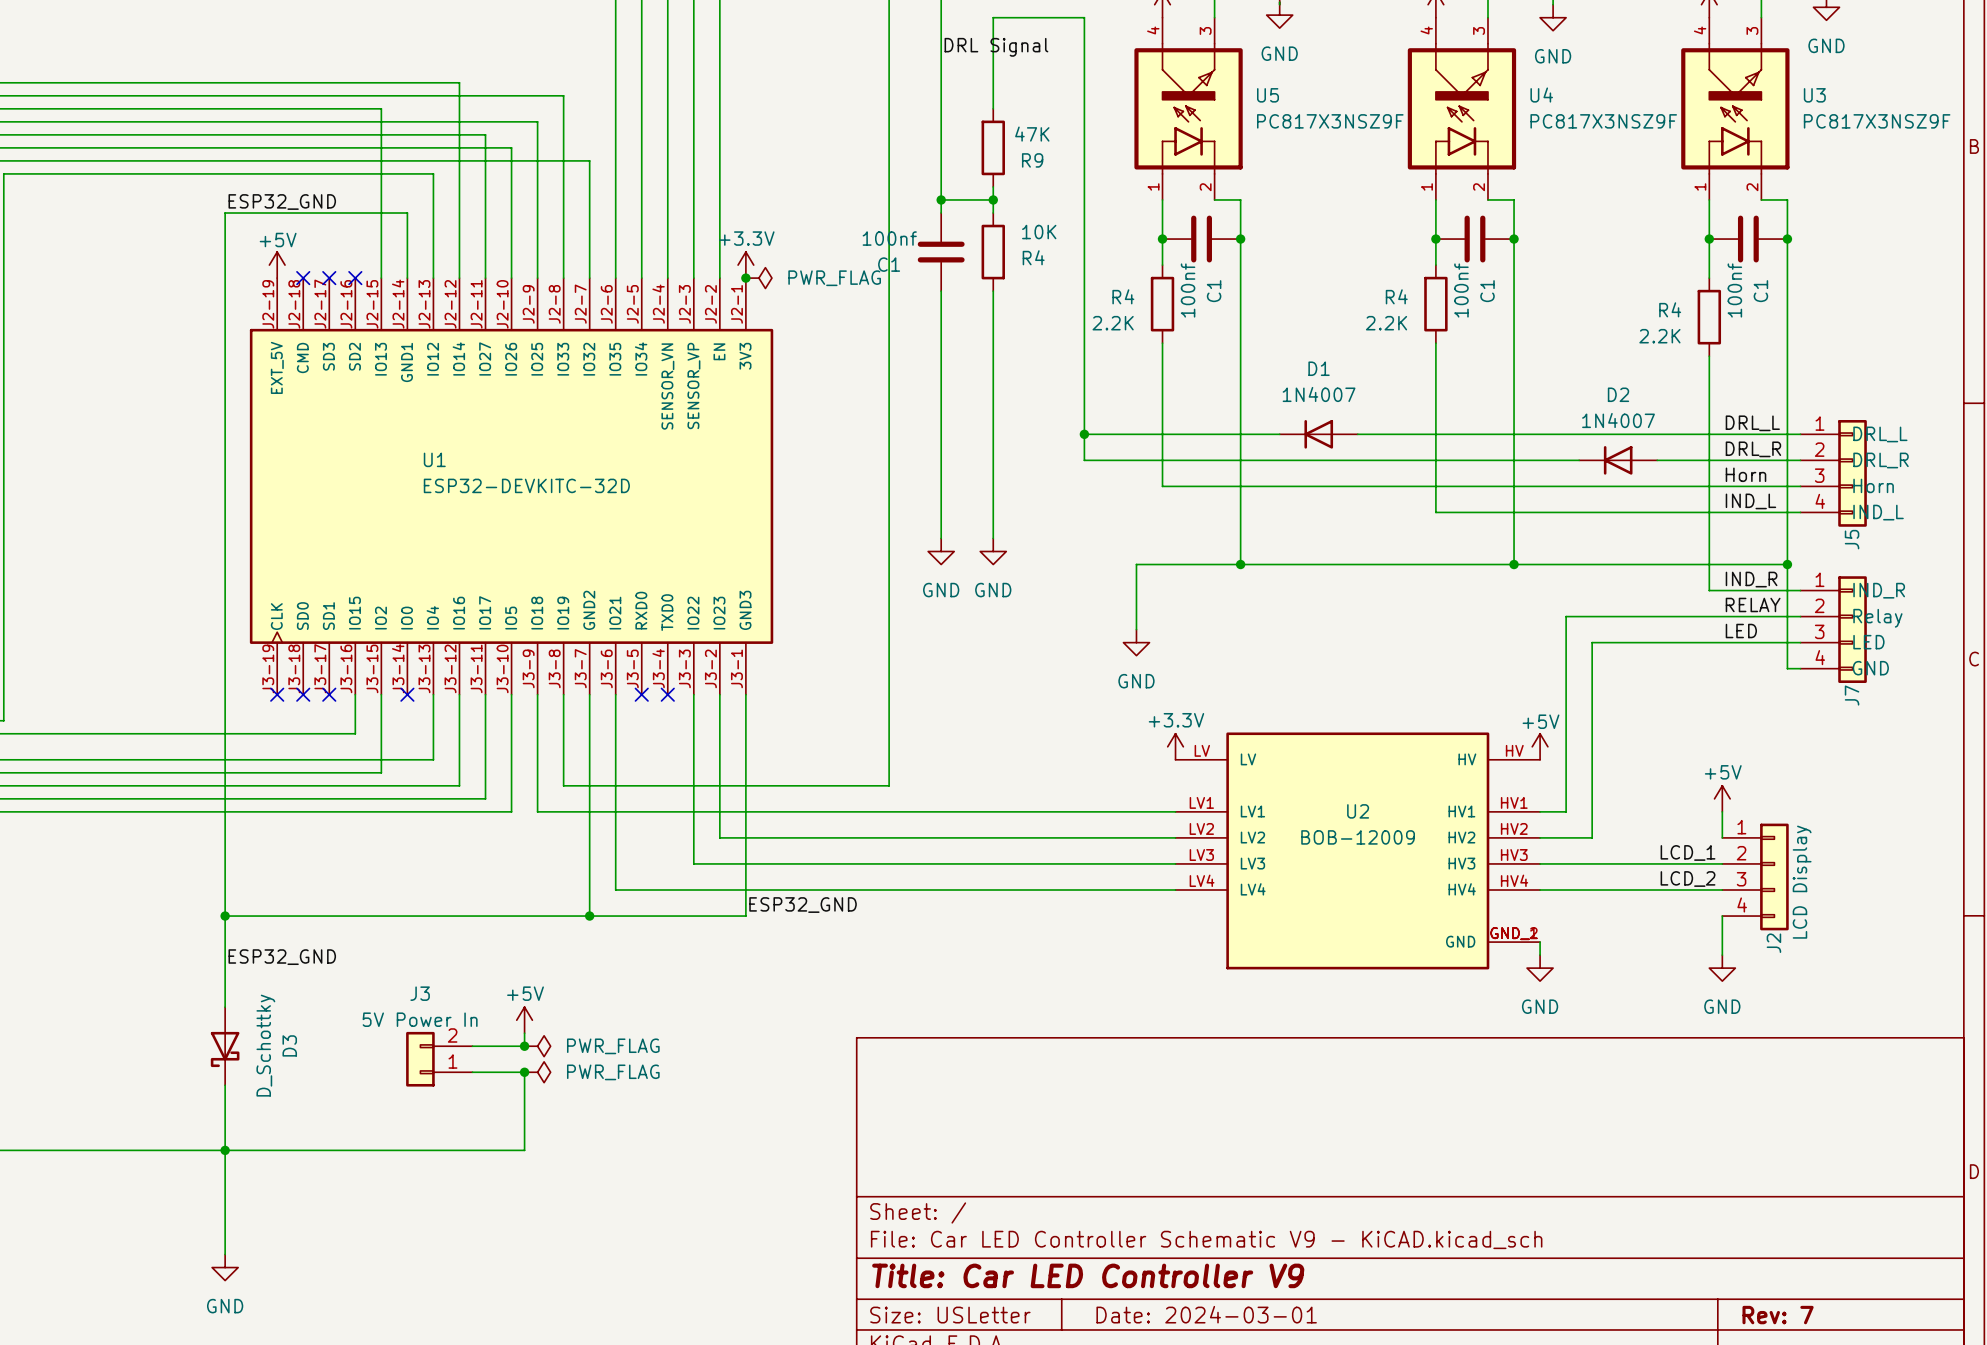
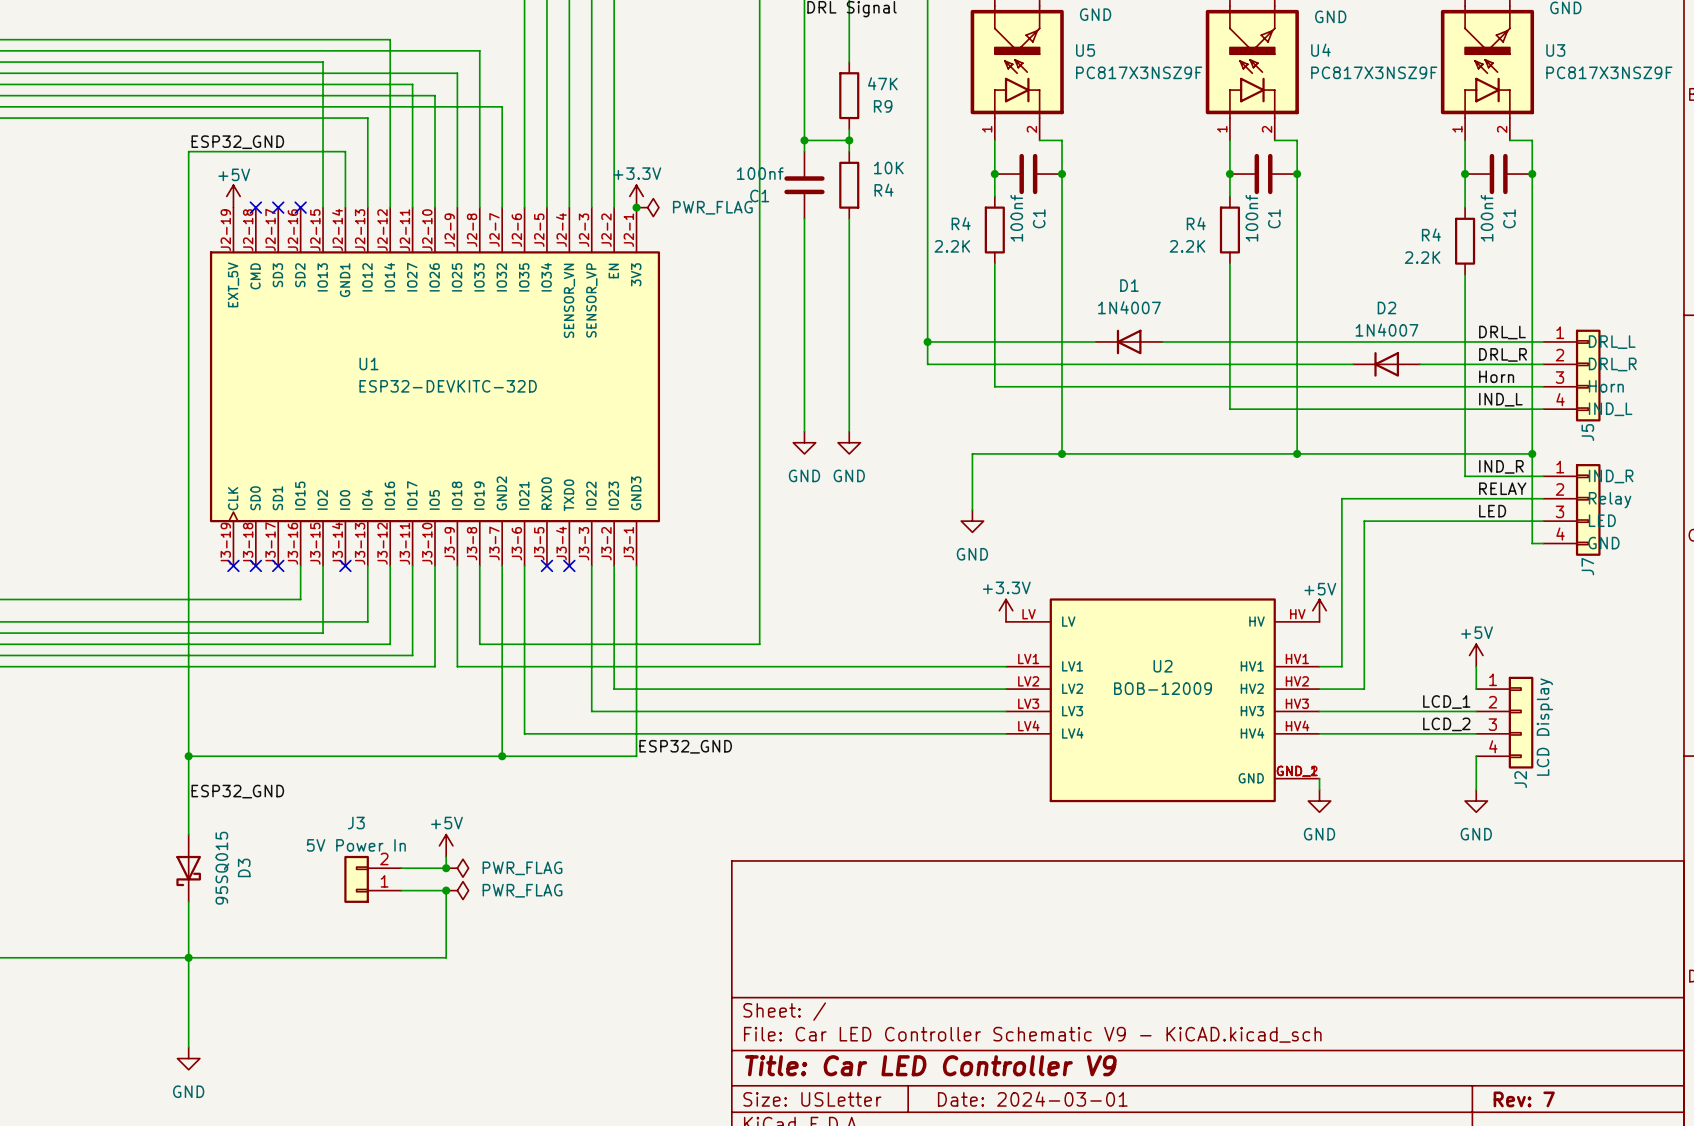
D3 value: D_Schottky (265, 1045) -> 95SQ015 (222, 868)

